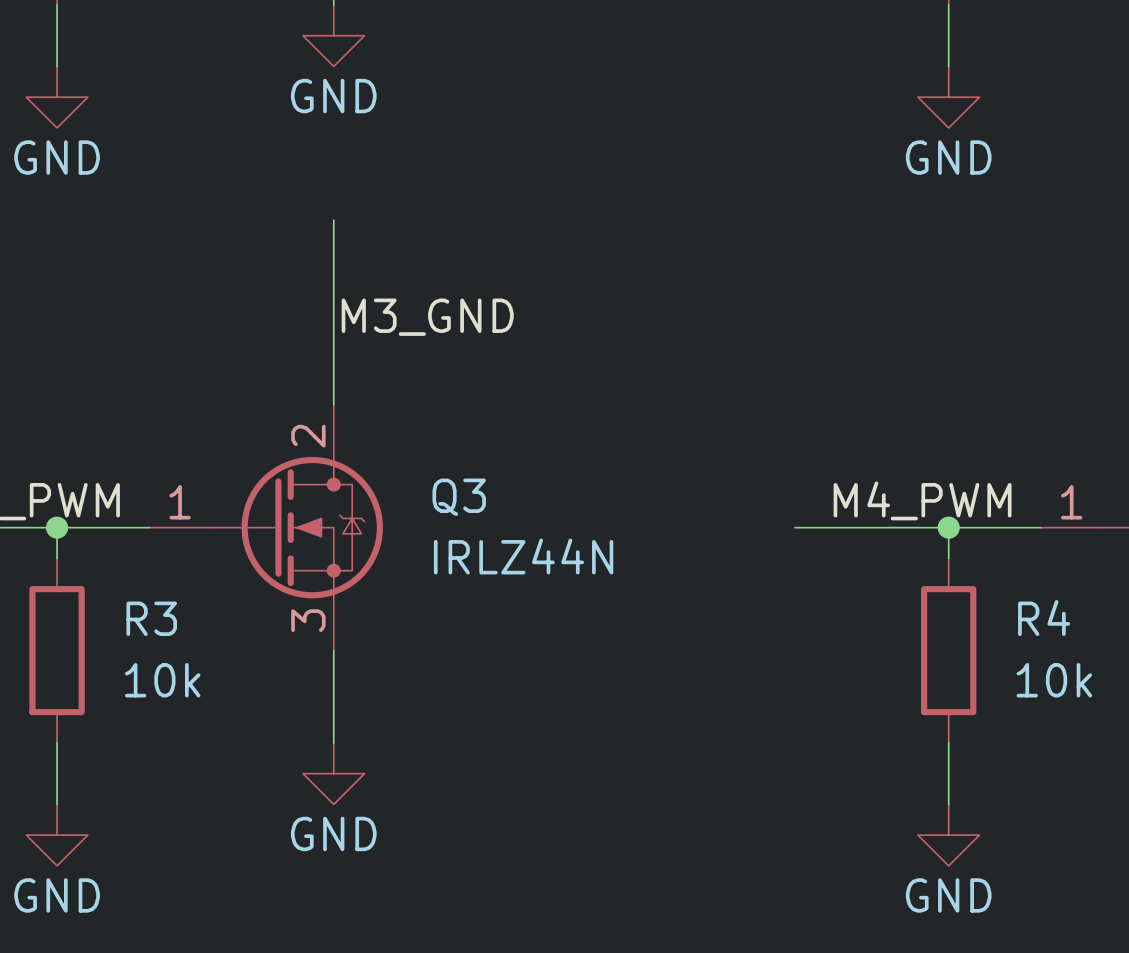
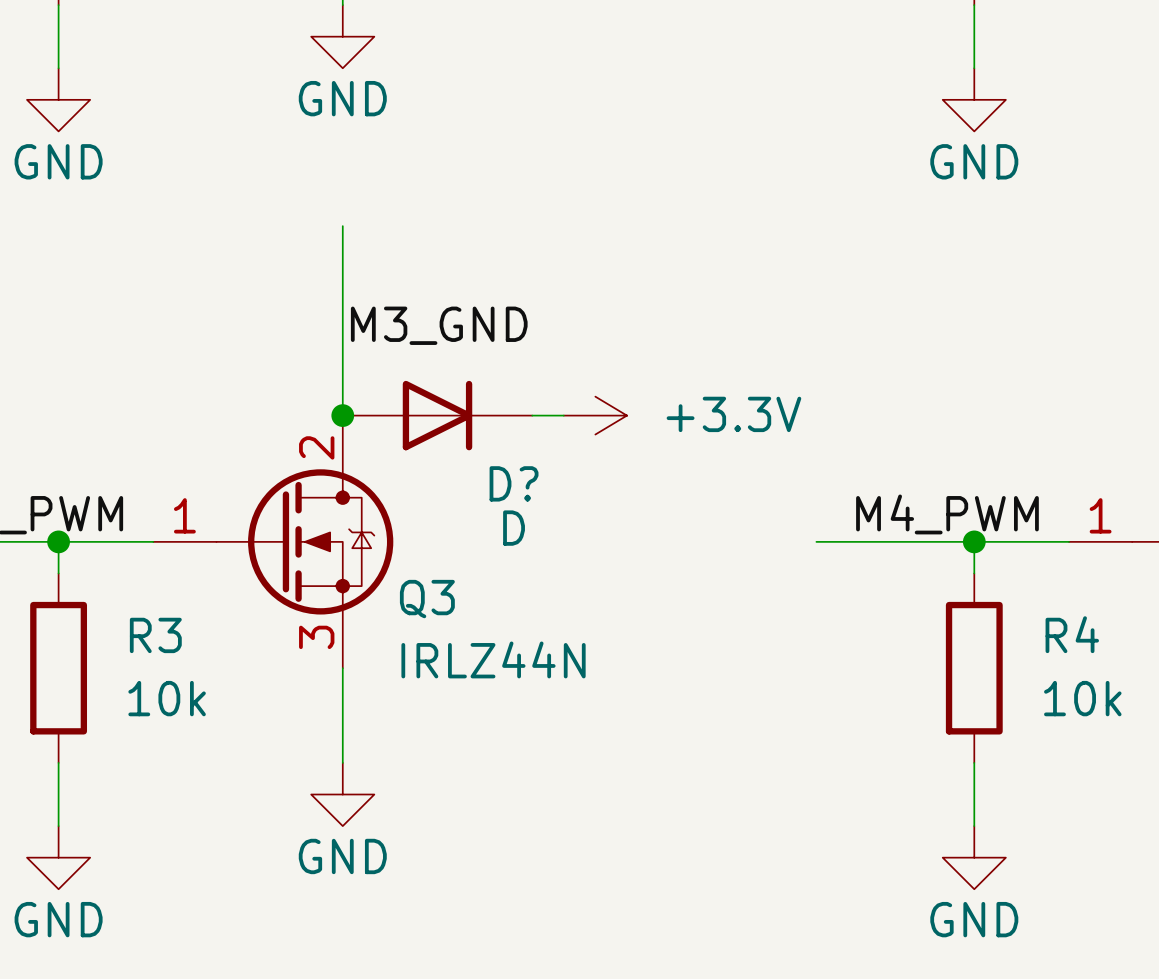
junction: none -> (342, 415)
D?: none -> D (437, 415)
wire: none -> (532, 415) (563, 415)
power symbol: none -> +3.3V (595, 415)
Q3 name position: Q3 (459, 497) -> Q3 (427, 599)
Q3 value position: IRLZ44N (523, 556) -> IRLZ44N (493, 659)

